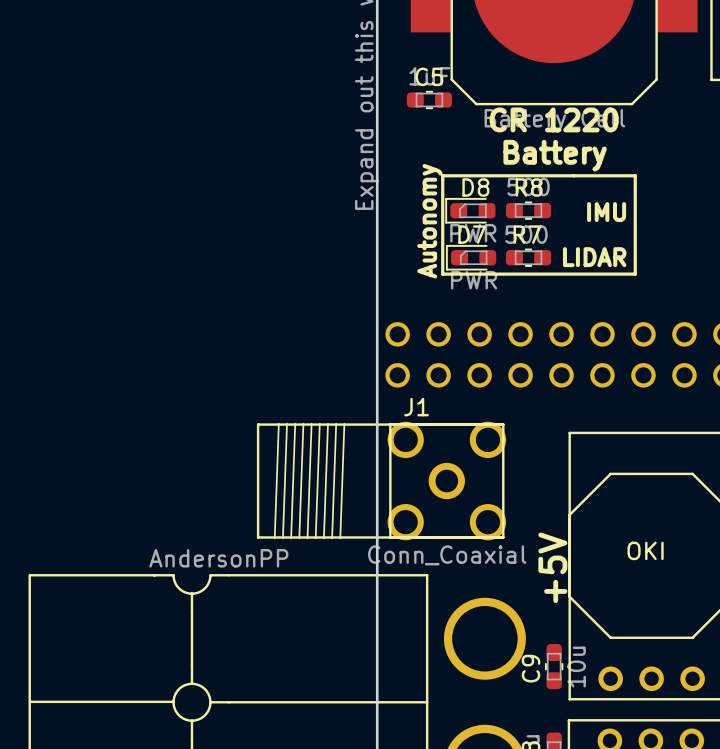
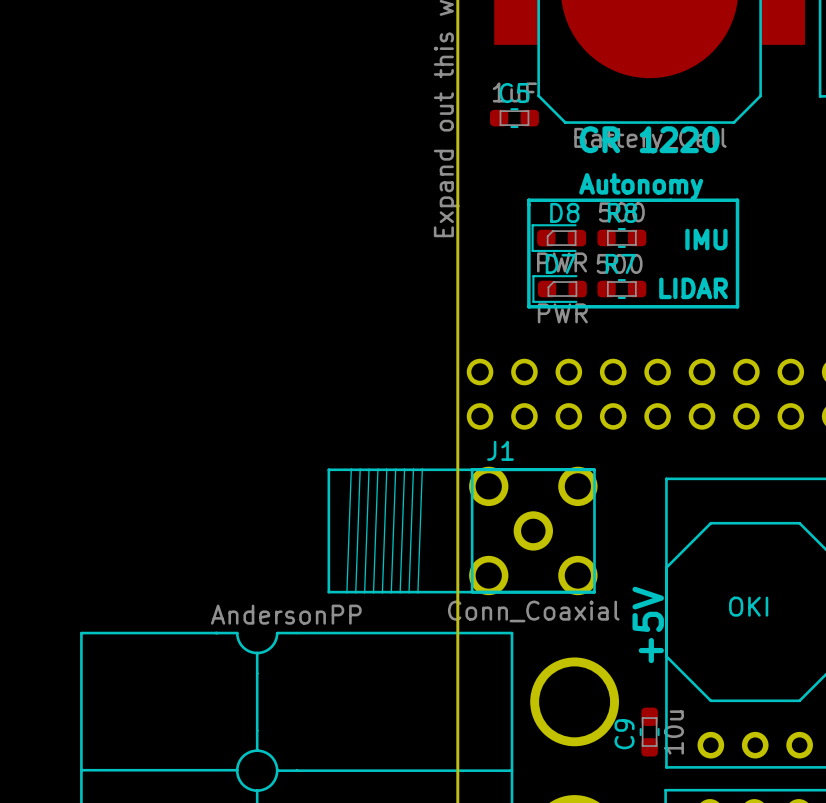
text: Battery (555, 155) -> Autonomy (641, 186)
text: Autonomy (429, 221) -> none

